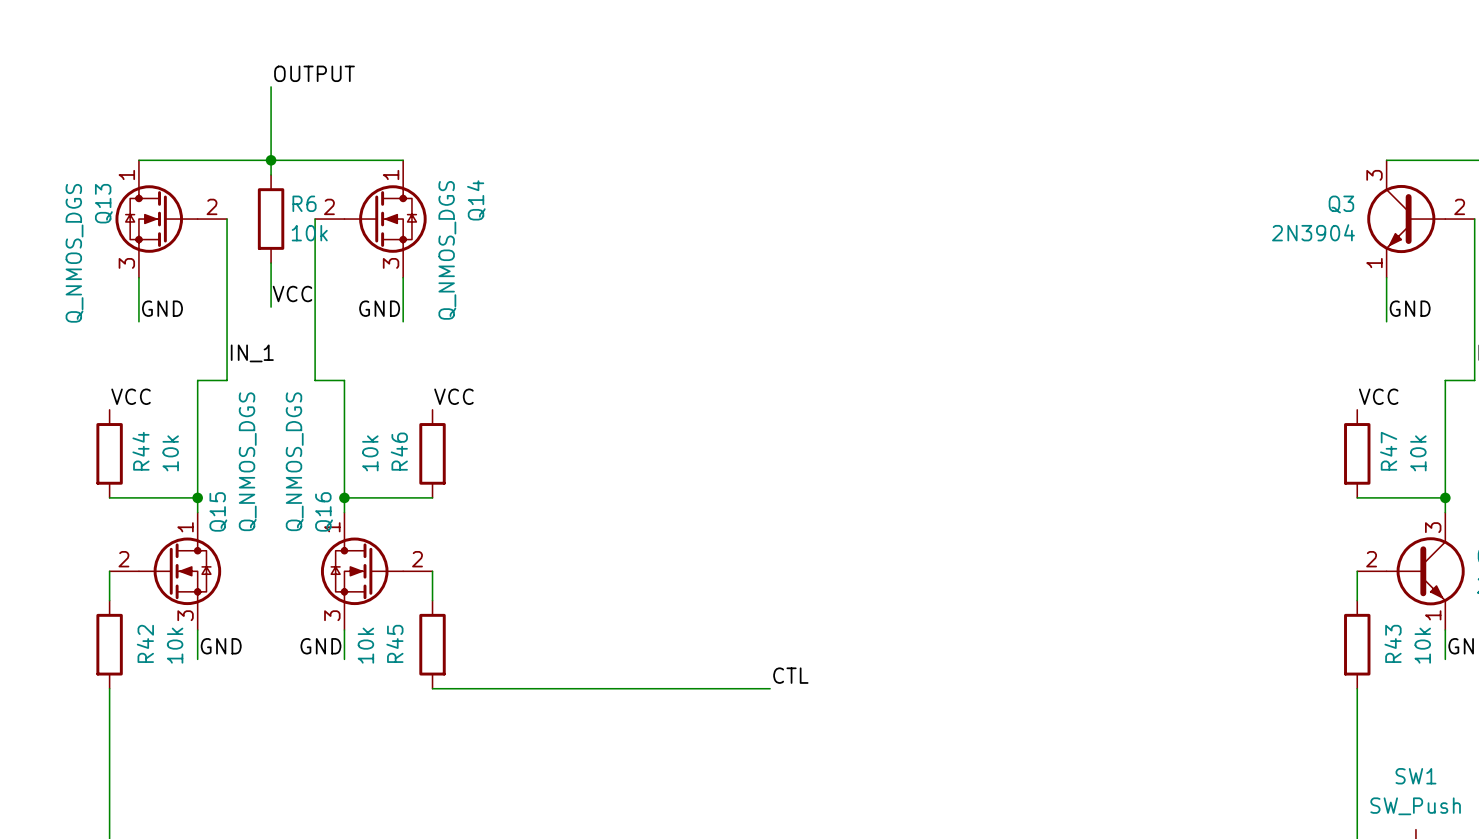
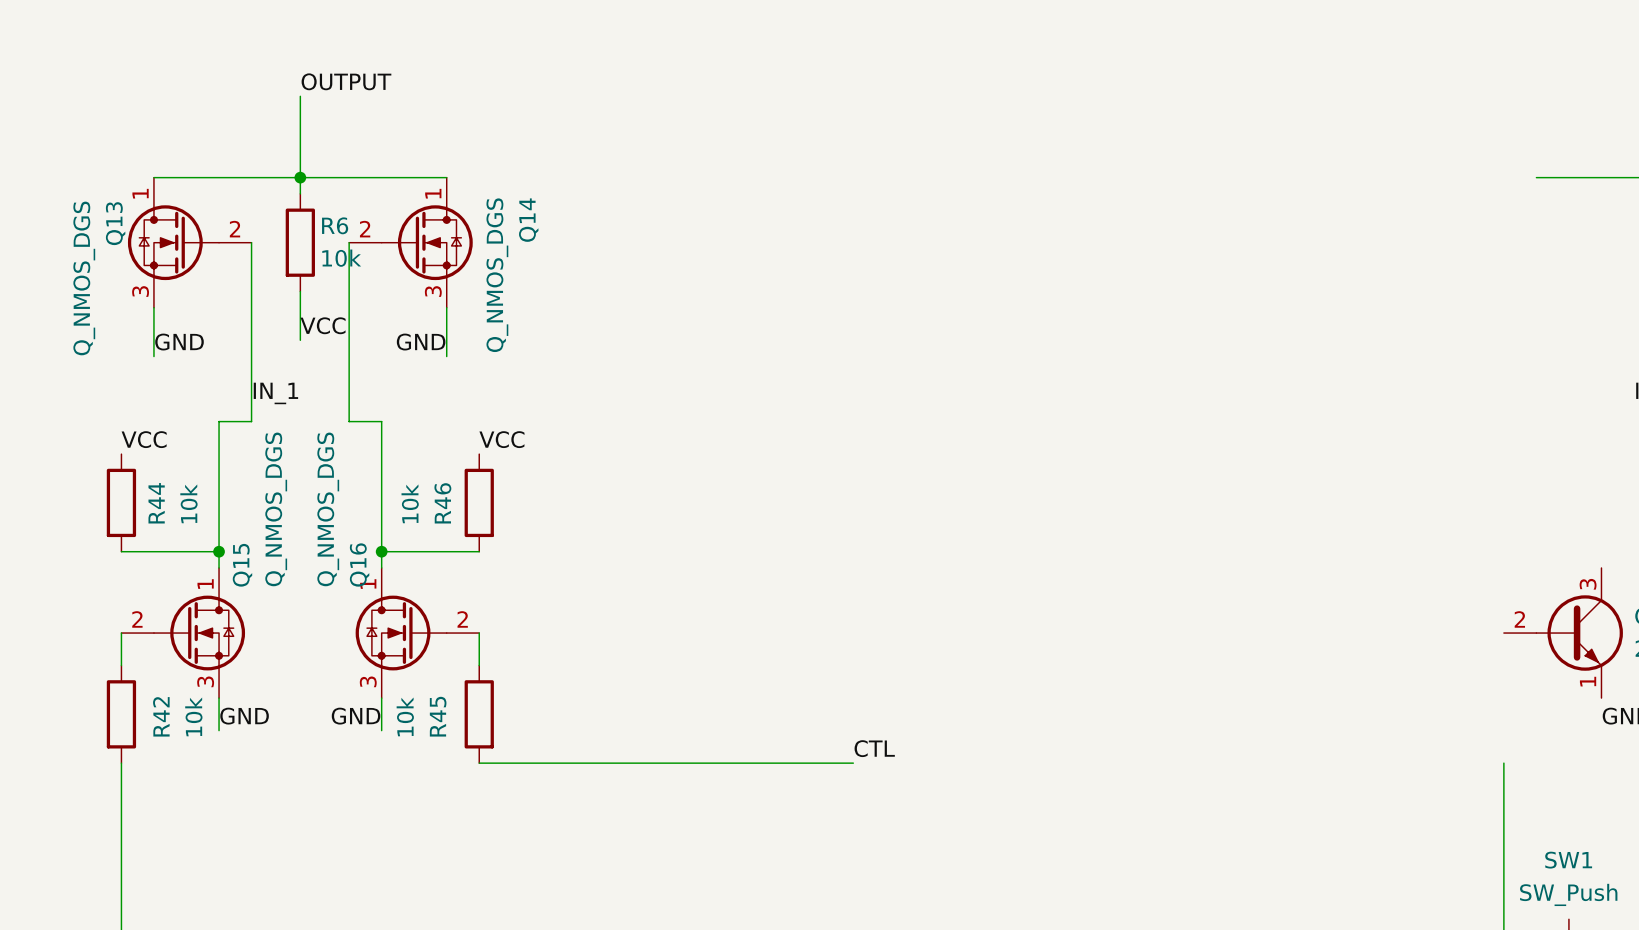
Q3: 2N3904 (1420, 219) -> none
wire: (1474, 219) (1474, 380) (1445, 380) (1445, 512) -> none
wire: (1386, 277) (1386, 321) -> none
label: GND (1410, 308) -> none
label: VCC (1378, 396) -> none
R47: 10k (1357, 453) -> none
wire: (1357, 497) (1445, 497) -> none
junction: (1445, 497) -> none
wire: (1357, 571) (1357, 600) -> none
wire: (1445, 630) (1445, 659) -> none
R43: 10k (1357, 644) -> none

